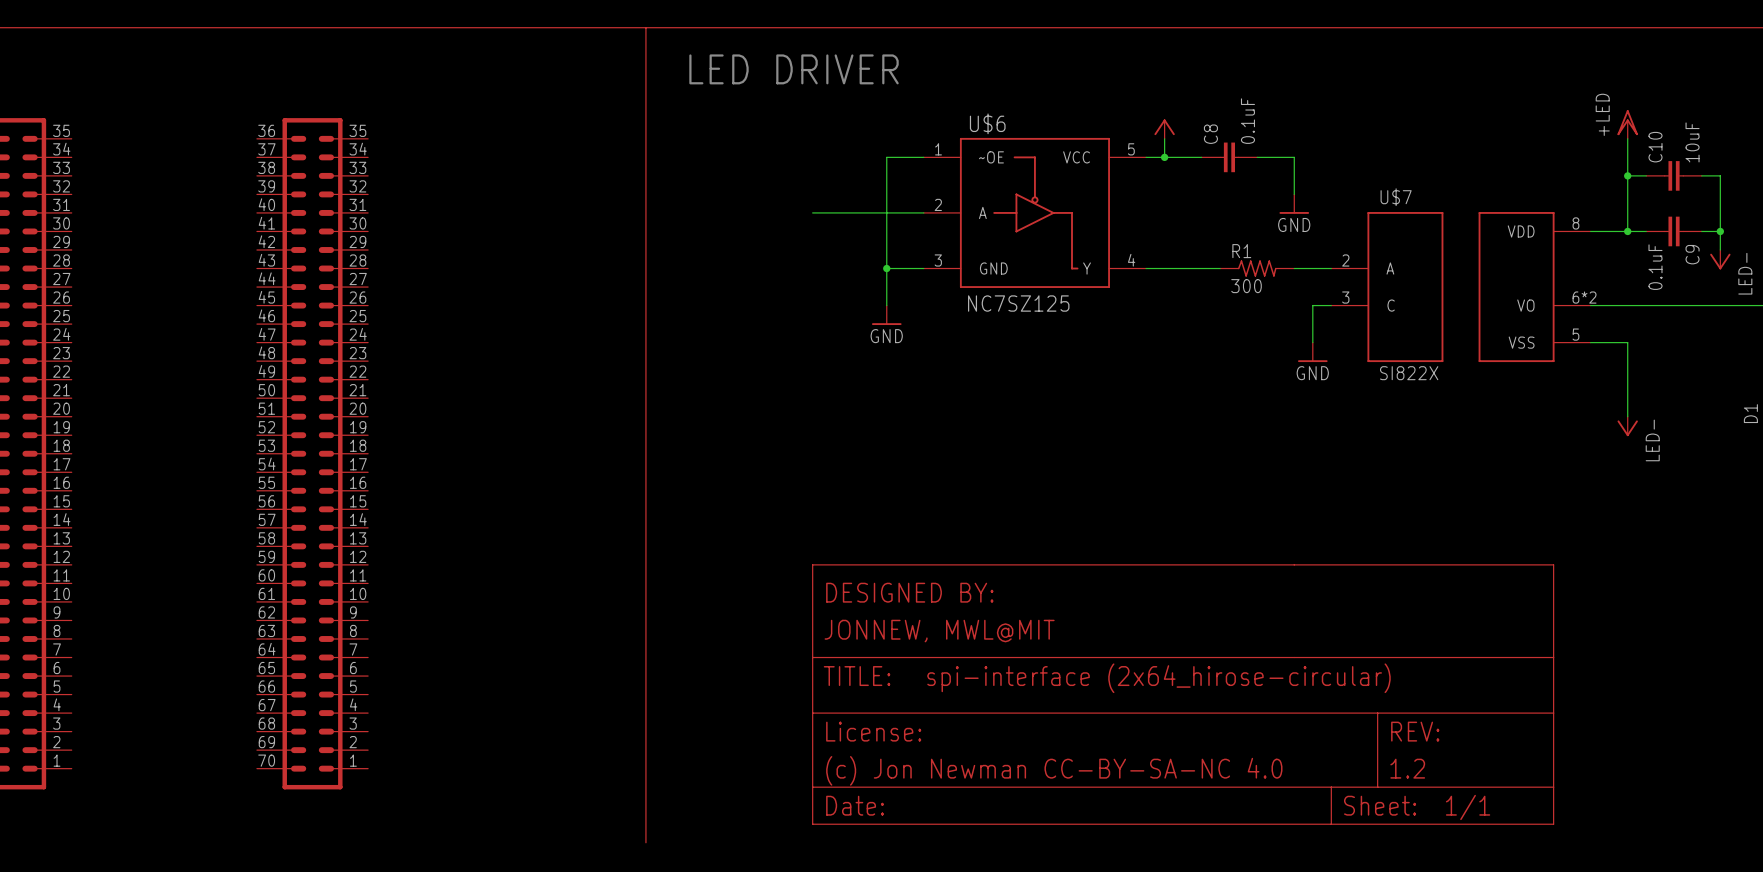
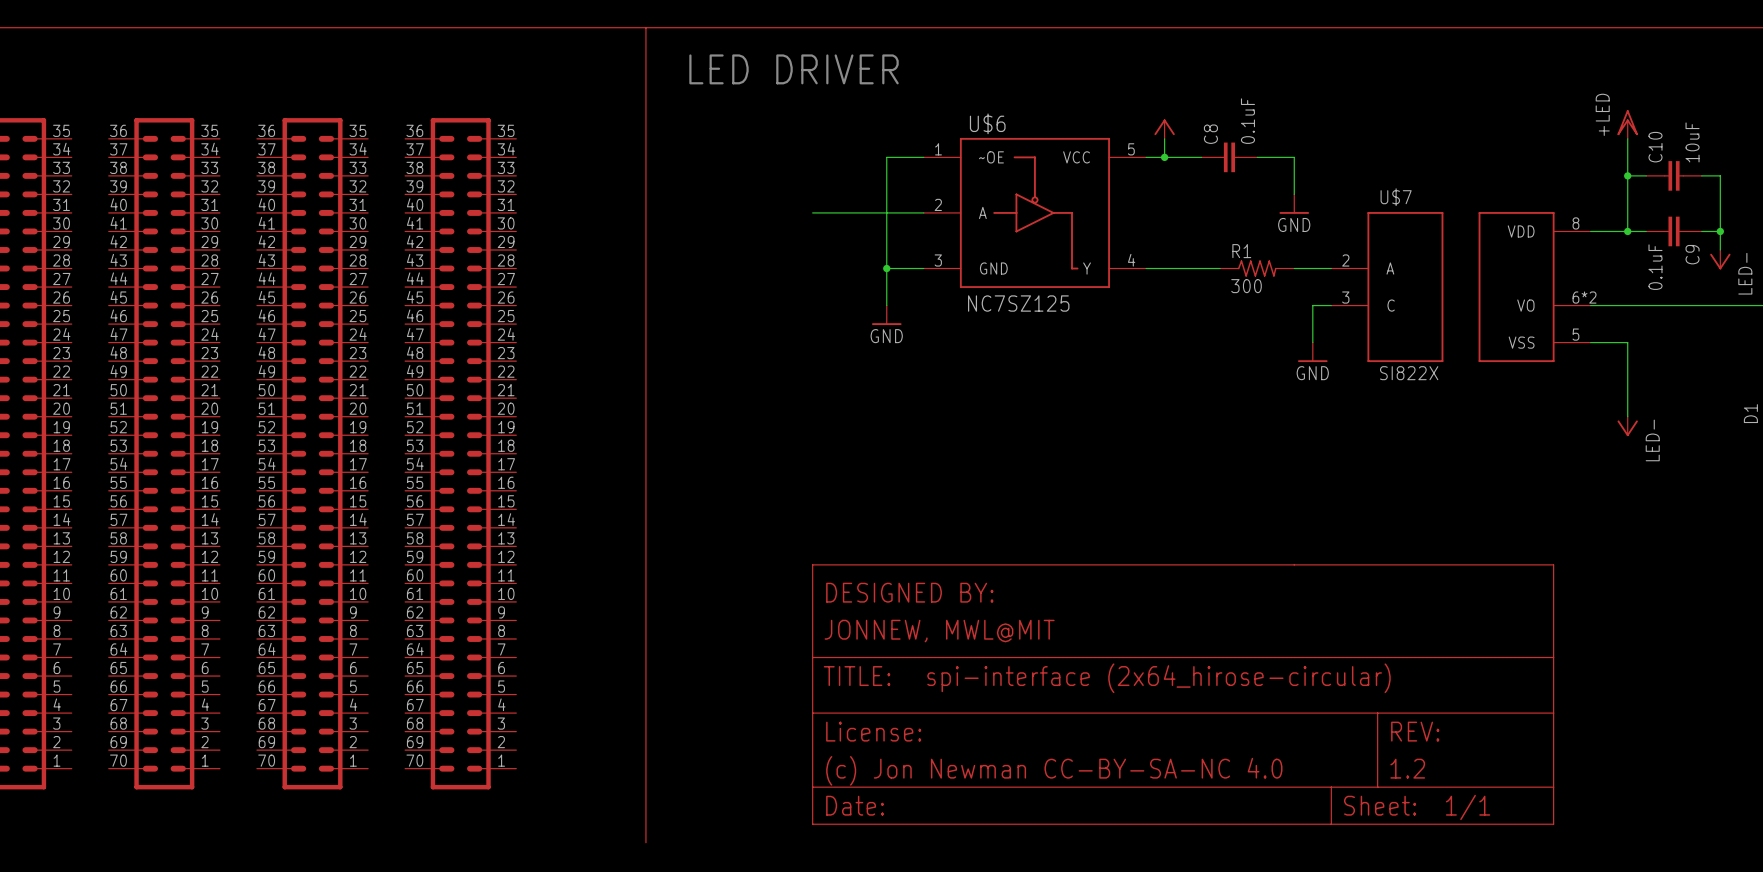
part: none -> (164, 453)
part: none -> (460, 453)

